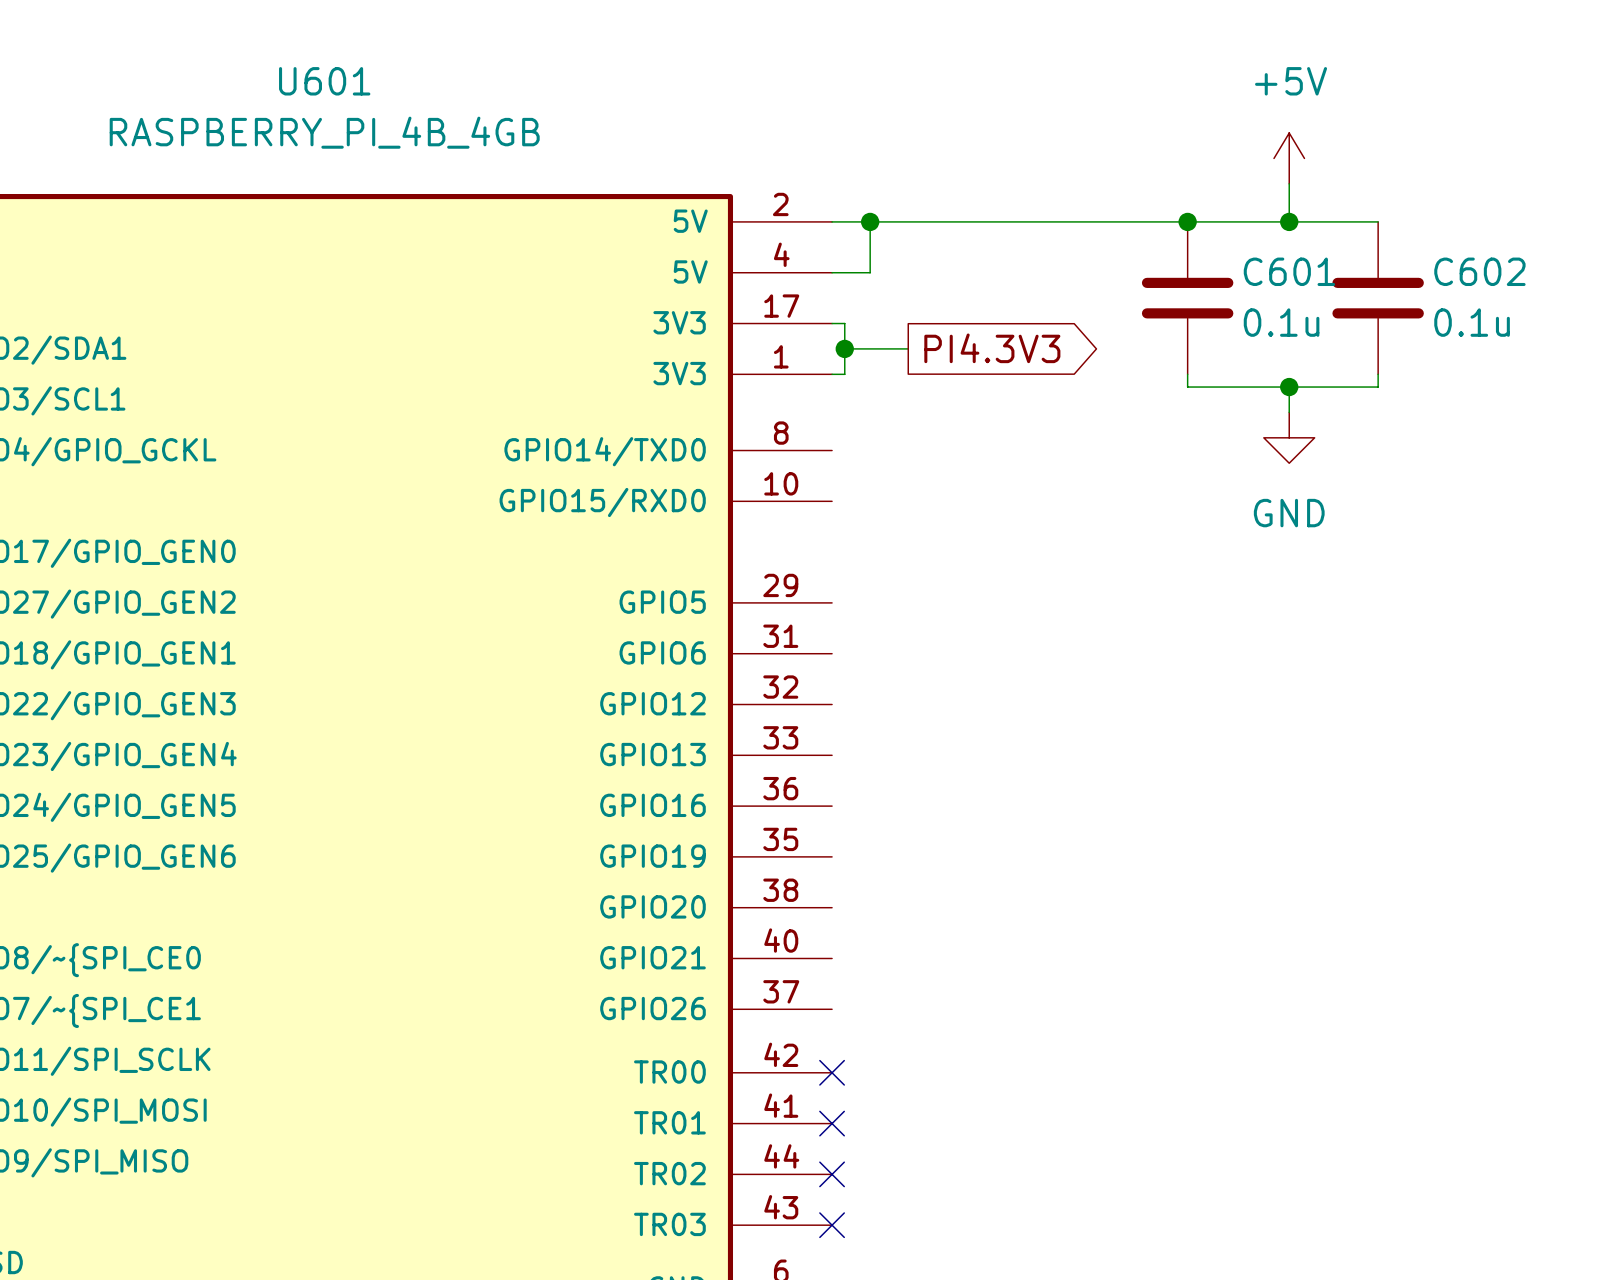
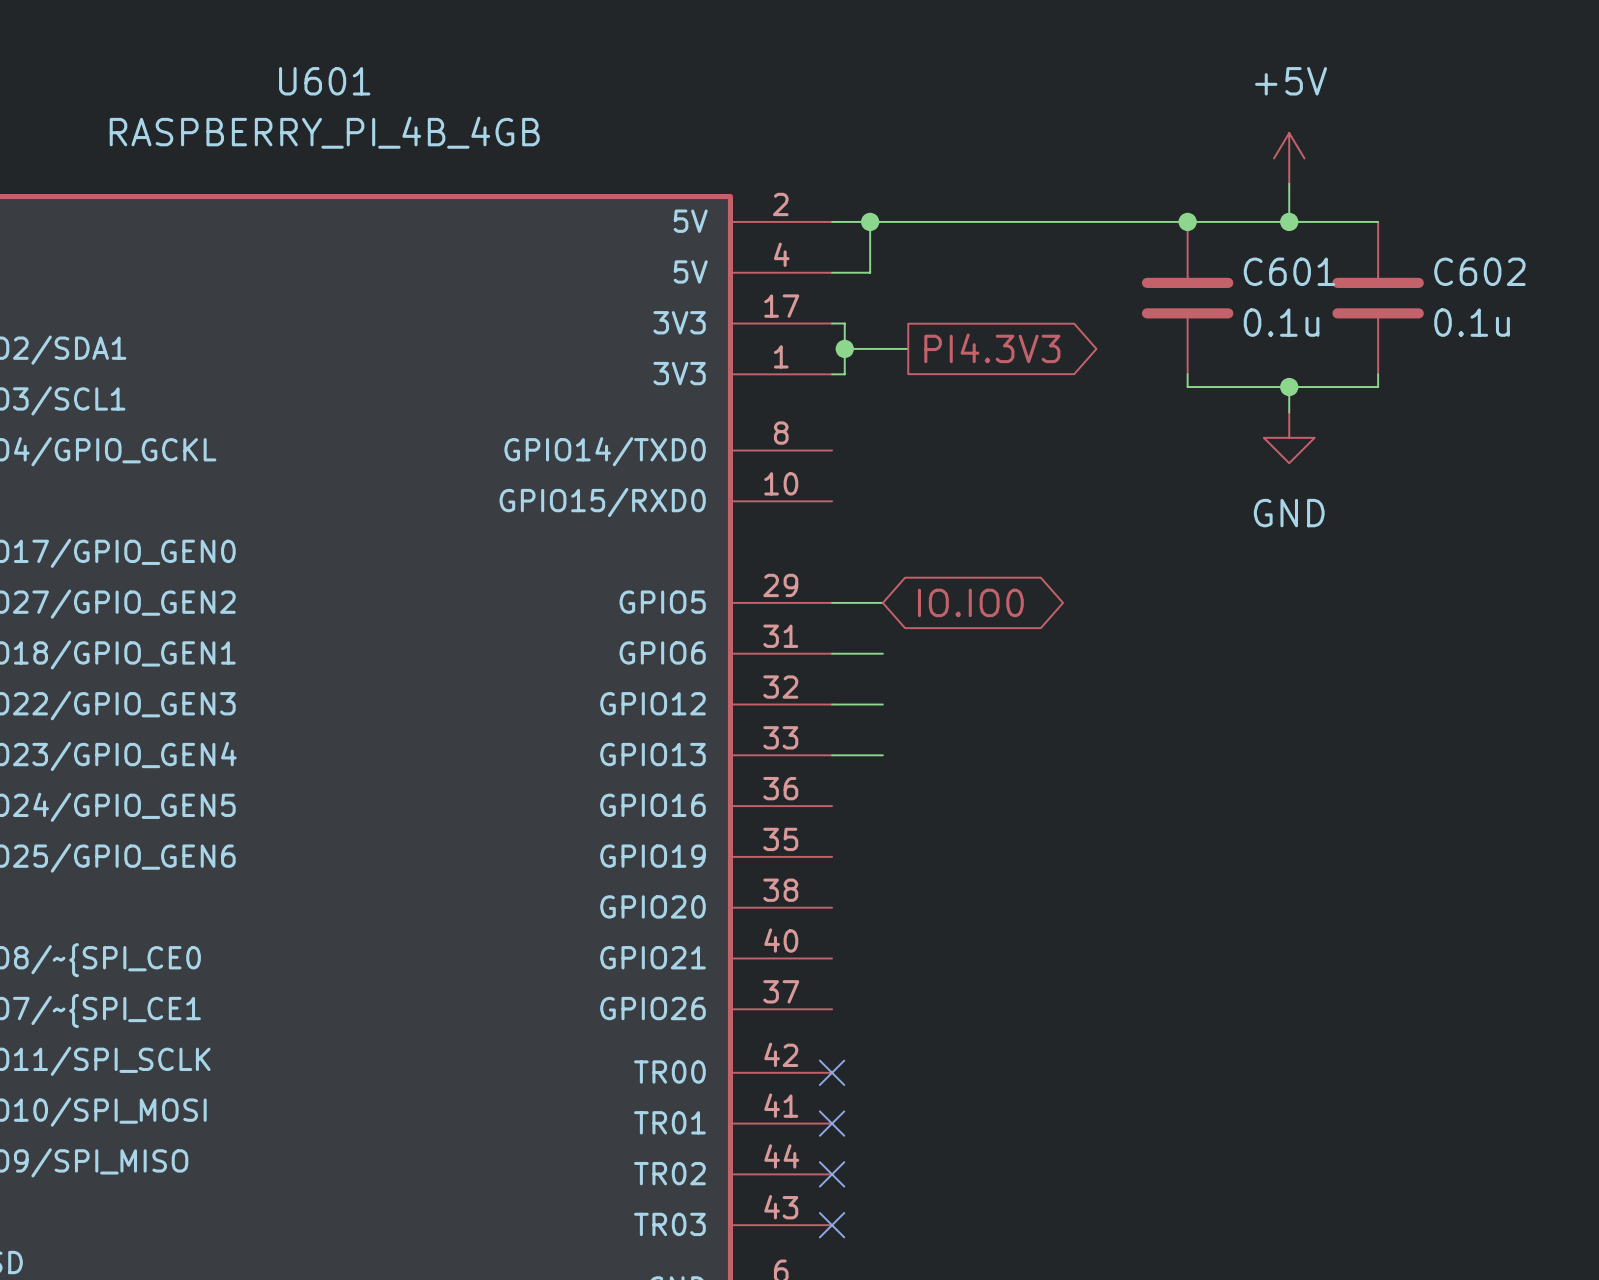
wire: none -> (832, 602) (882, 602)
global label: none -> IO.IO0 (970, 602)
wire: none -> (832, 653) (882, 653)
wire: none -> (832, 704) (882, 704)
wire: none -> (832, 755) (882, 755)

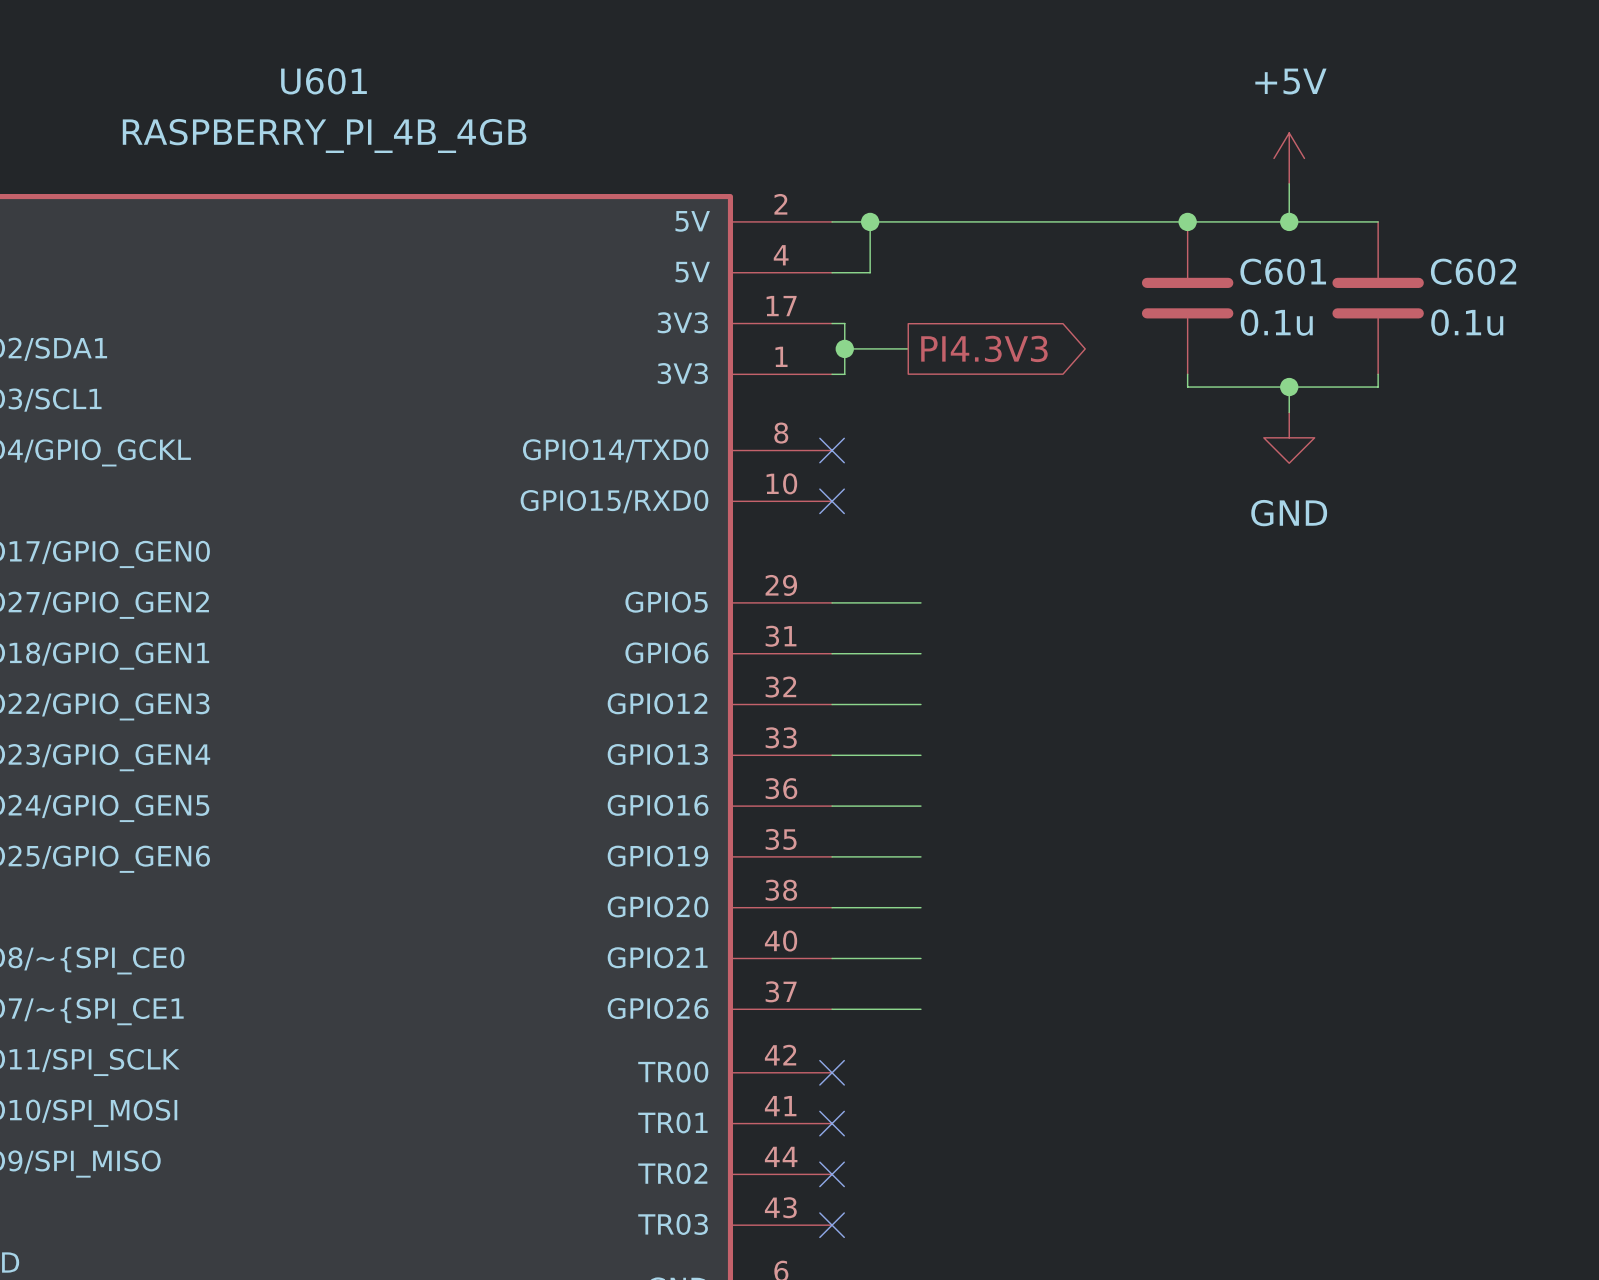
no-connect mark: none -> (832, 450)
no-connect mark: none -> (832, 501)
wire: none -> (882, 602) (920, 602)
global label: IO.IO0 (970, 602) -> none
wire: none -> (882, 653) (920, 653)
wire: none -> (882, 704) (920, 704)
wire: none -> (882, 755) (920, 755)
wire: none -> (832, 806) (920, 806)
wire: none -> (832, 856) (920, 856)
wire: none -> (832, 907) (920, 907)
wire: none -> (832, 958) (920, 958)
wire: none -> (832, 1009) (920, 1009)

